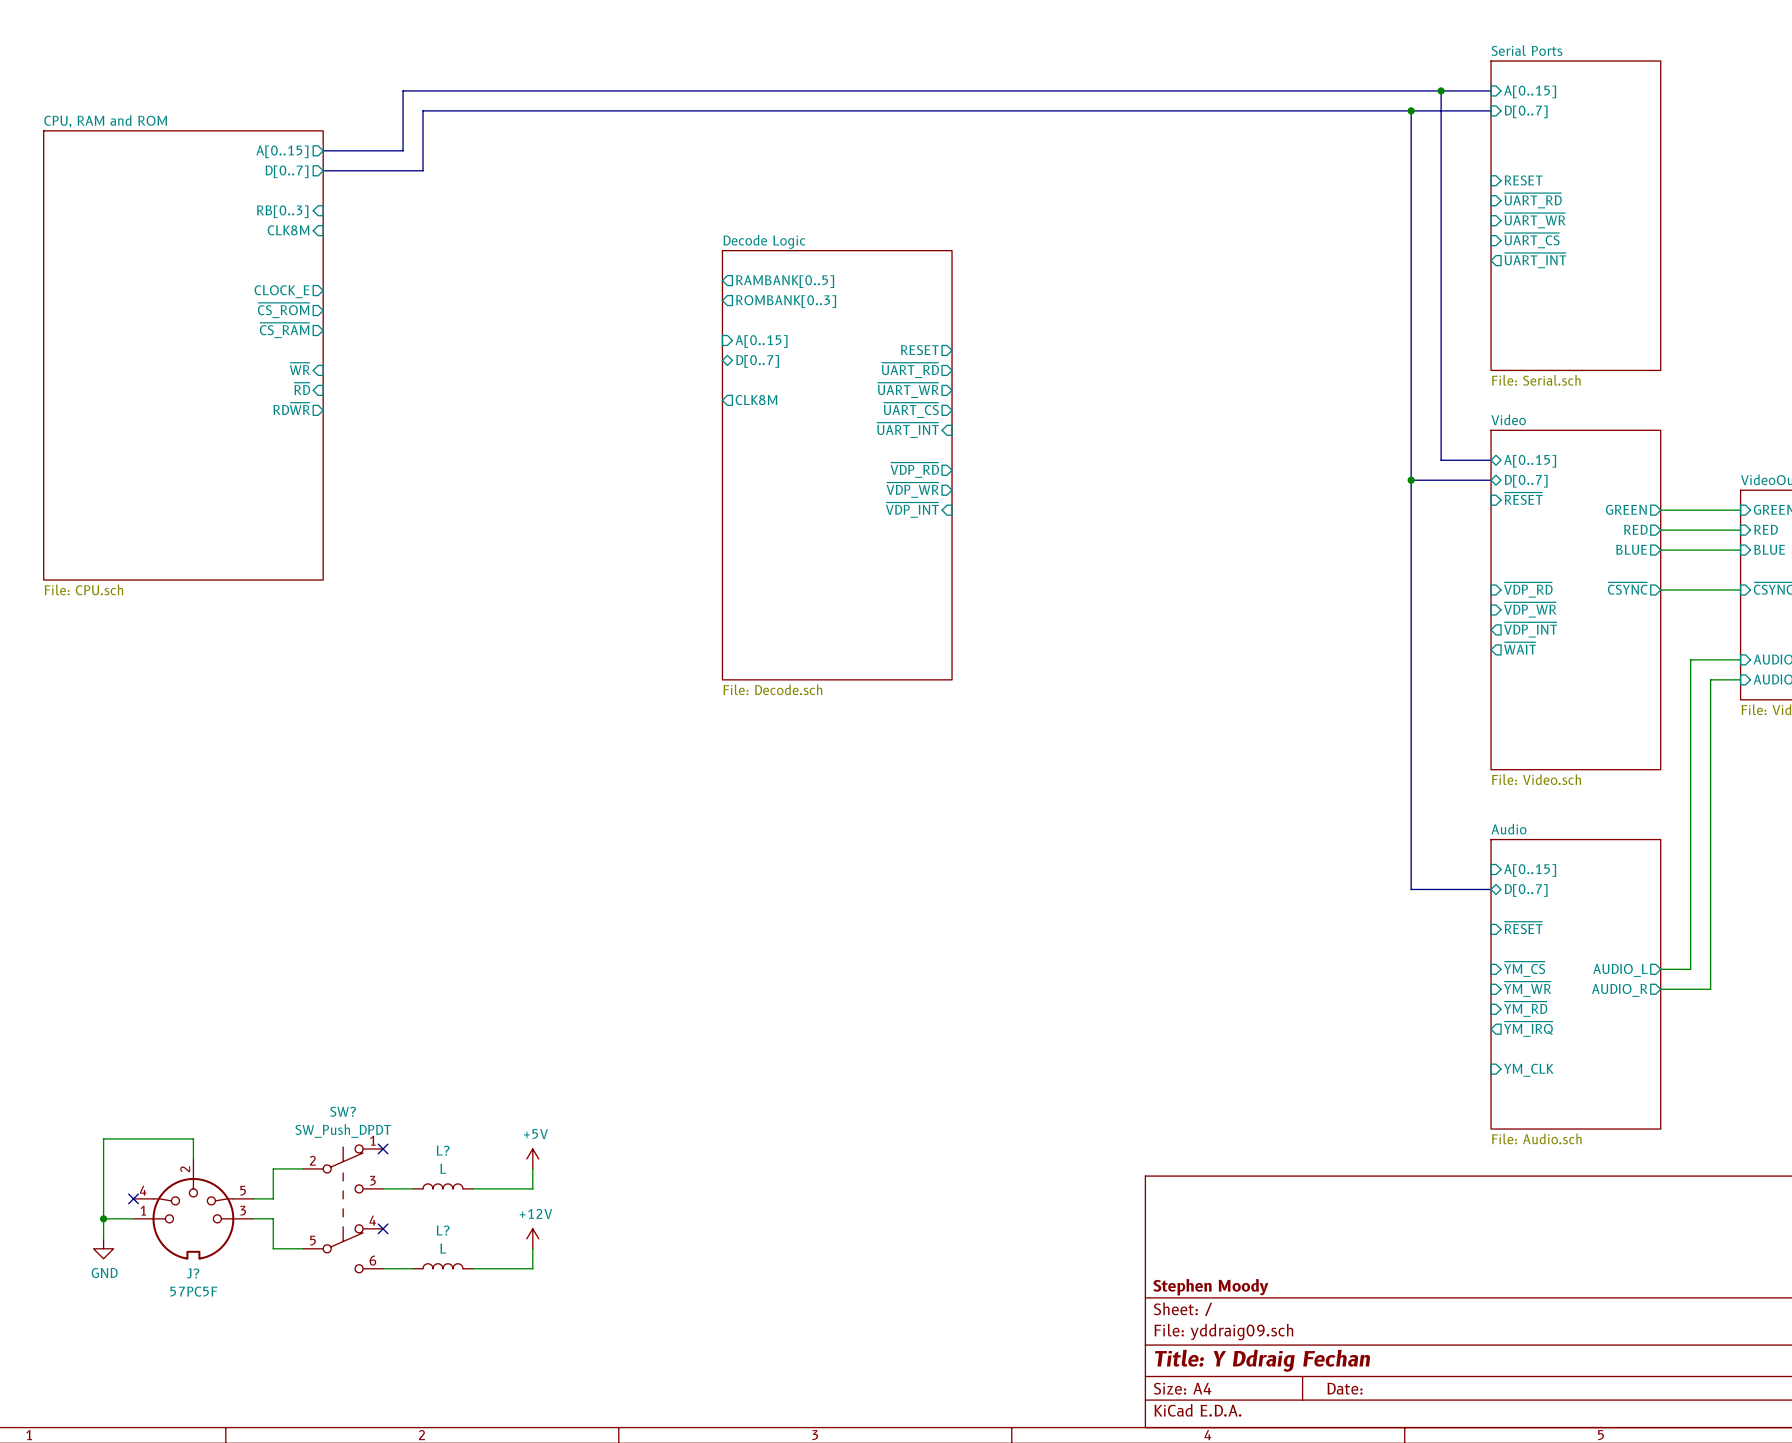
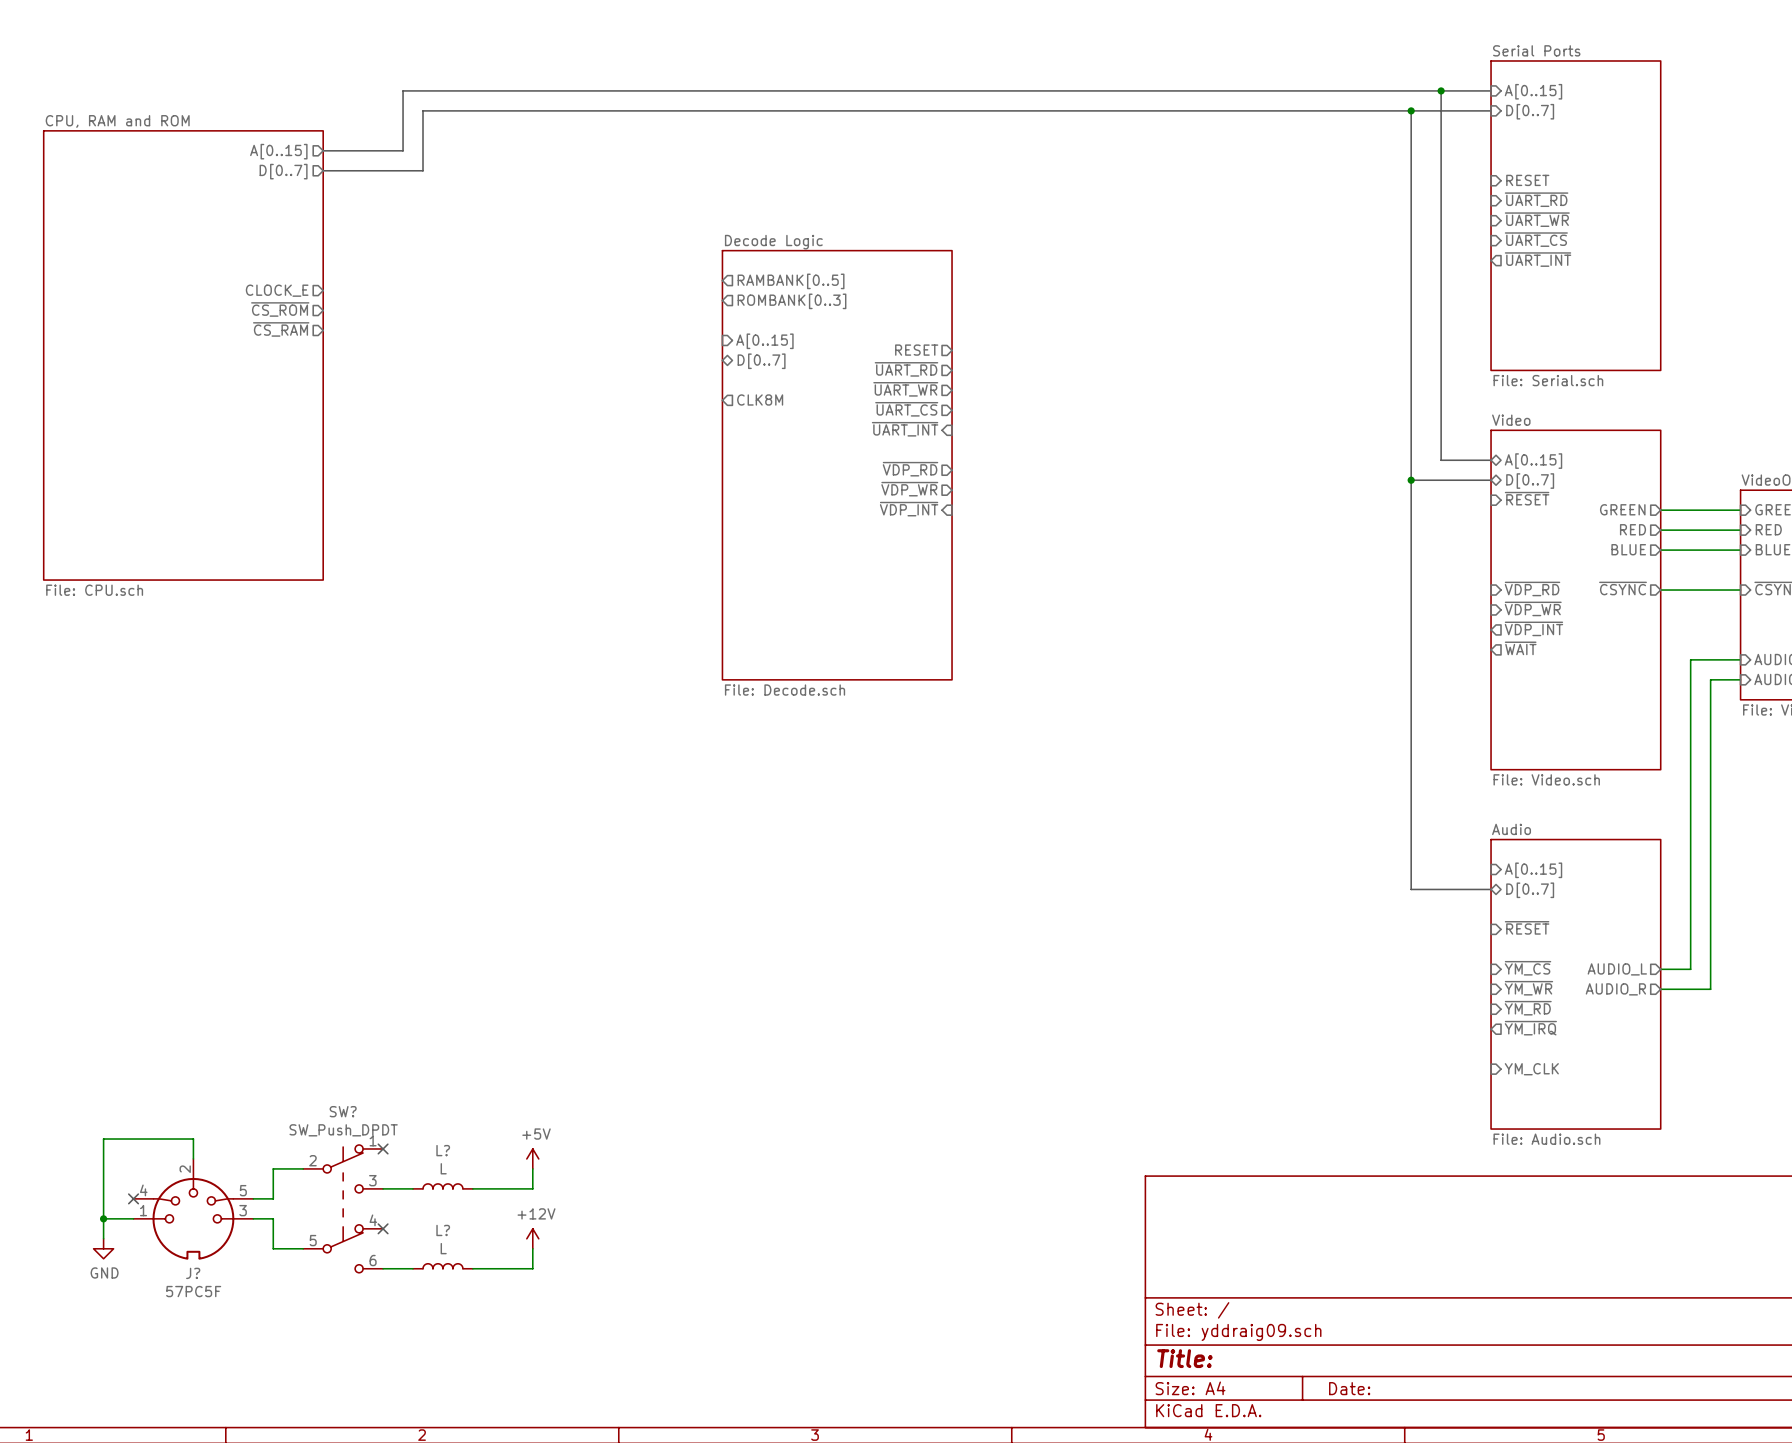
sheet pin: RB[0..3] (282, 211) -> none
sheet pin: CLK8M (288, 230) -> none
sheet pin: ~{WR} (300, 368) -> none
sheet pin: ~{RD} (302, 388) -> none
sheet pin: RD~{WR} (291, 408) -> none
title block: Stephen Moody (1210, 1287) -> none
title block: Title: Y Ddraig Fechan (1262, 1360) -> Title: (1184, 1358)

